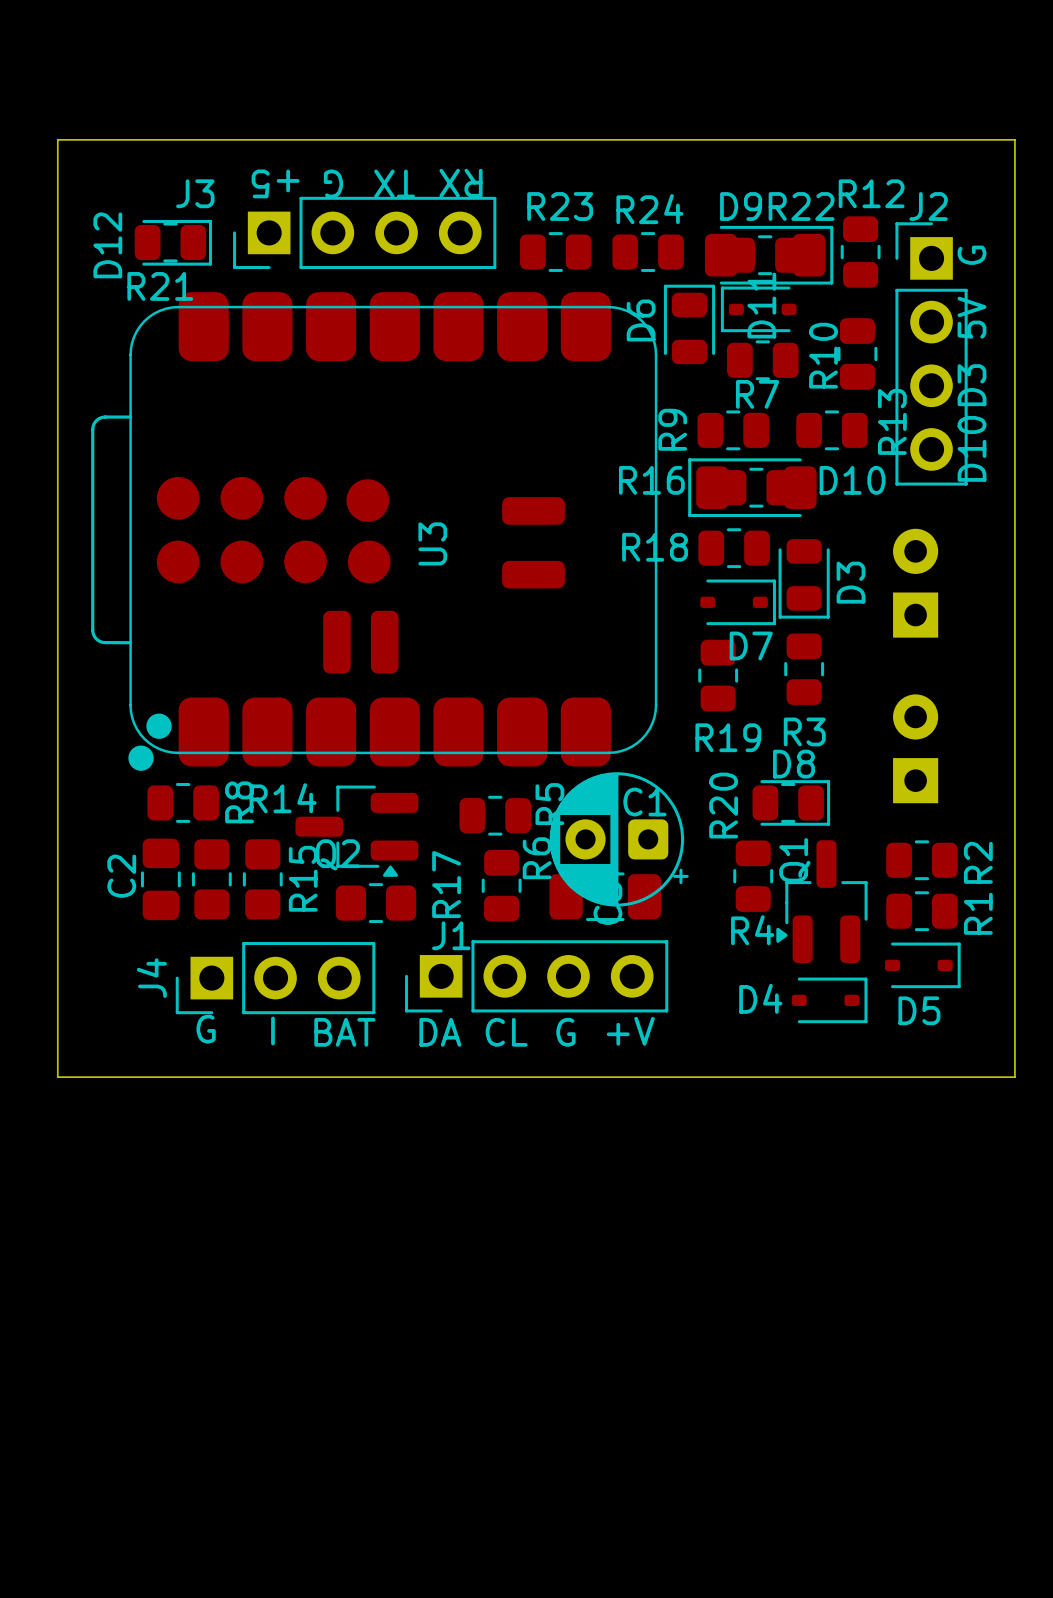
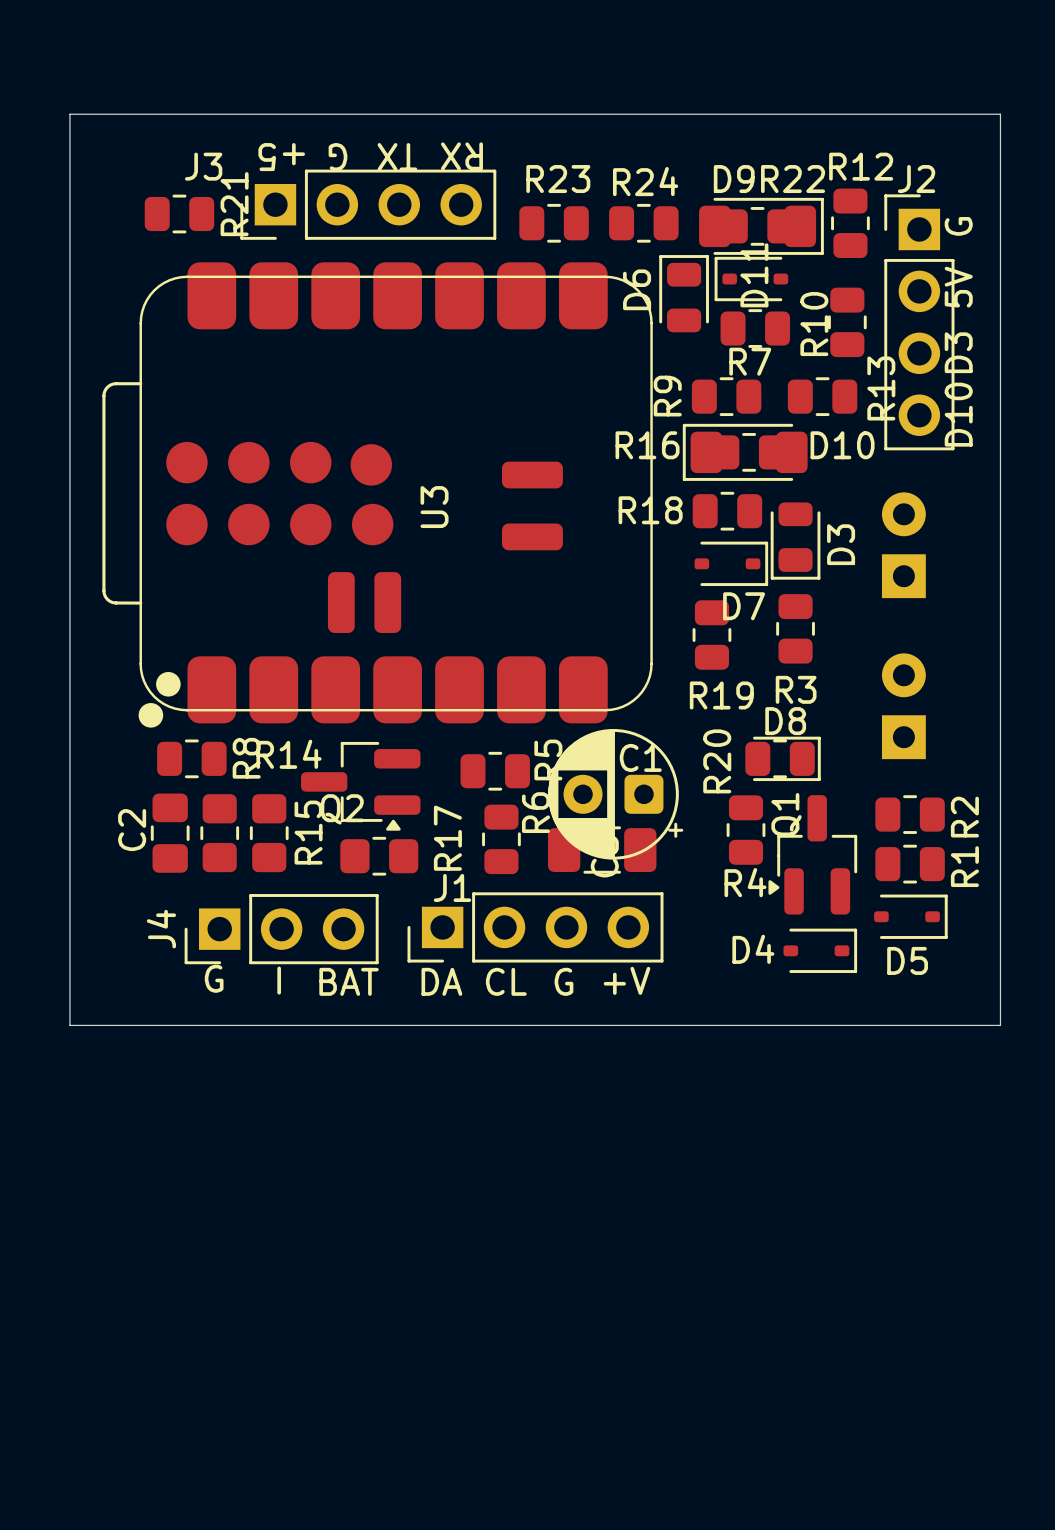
D12: (174, 242) -> none
R21 name rotation: 0° (160, 286) -> 90° counterclockwise (234, 204)
R21 name position: R21 (160, 286) -> R21 (234, 204)

